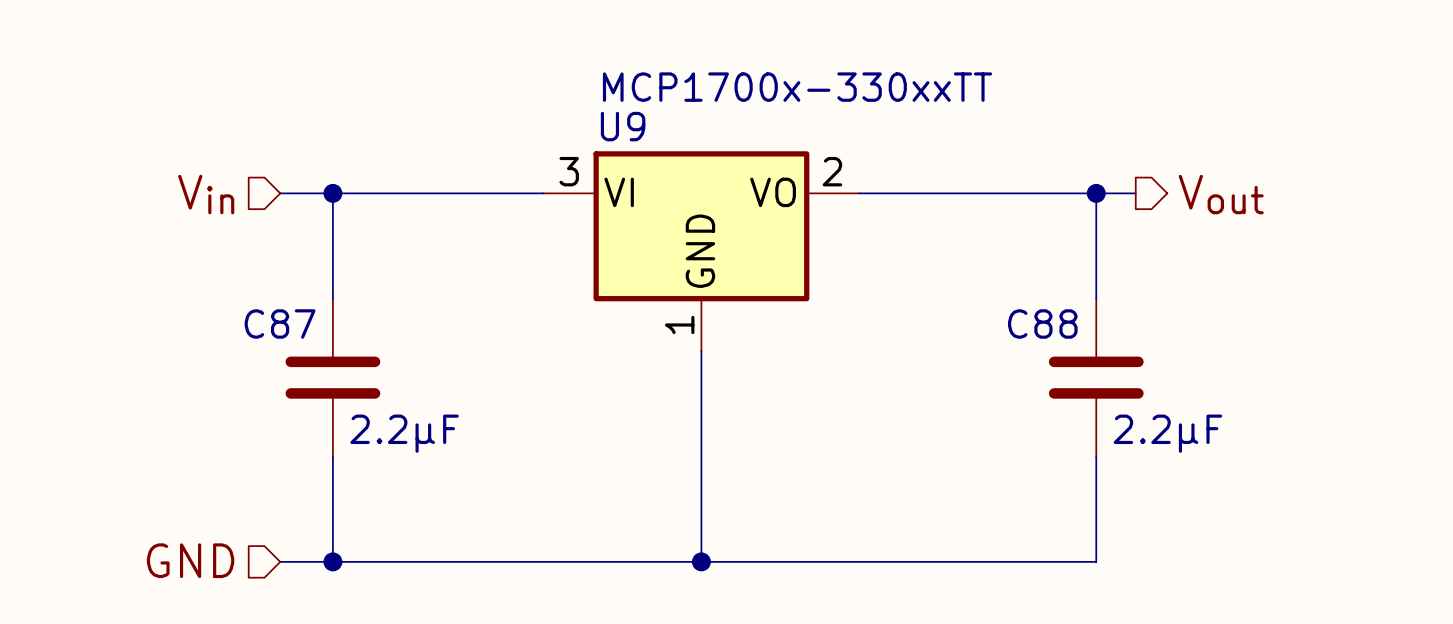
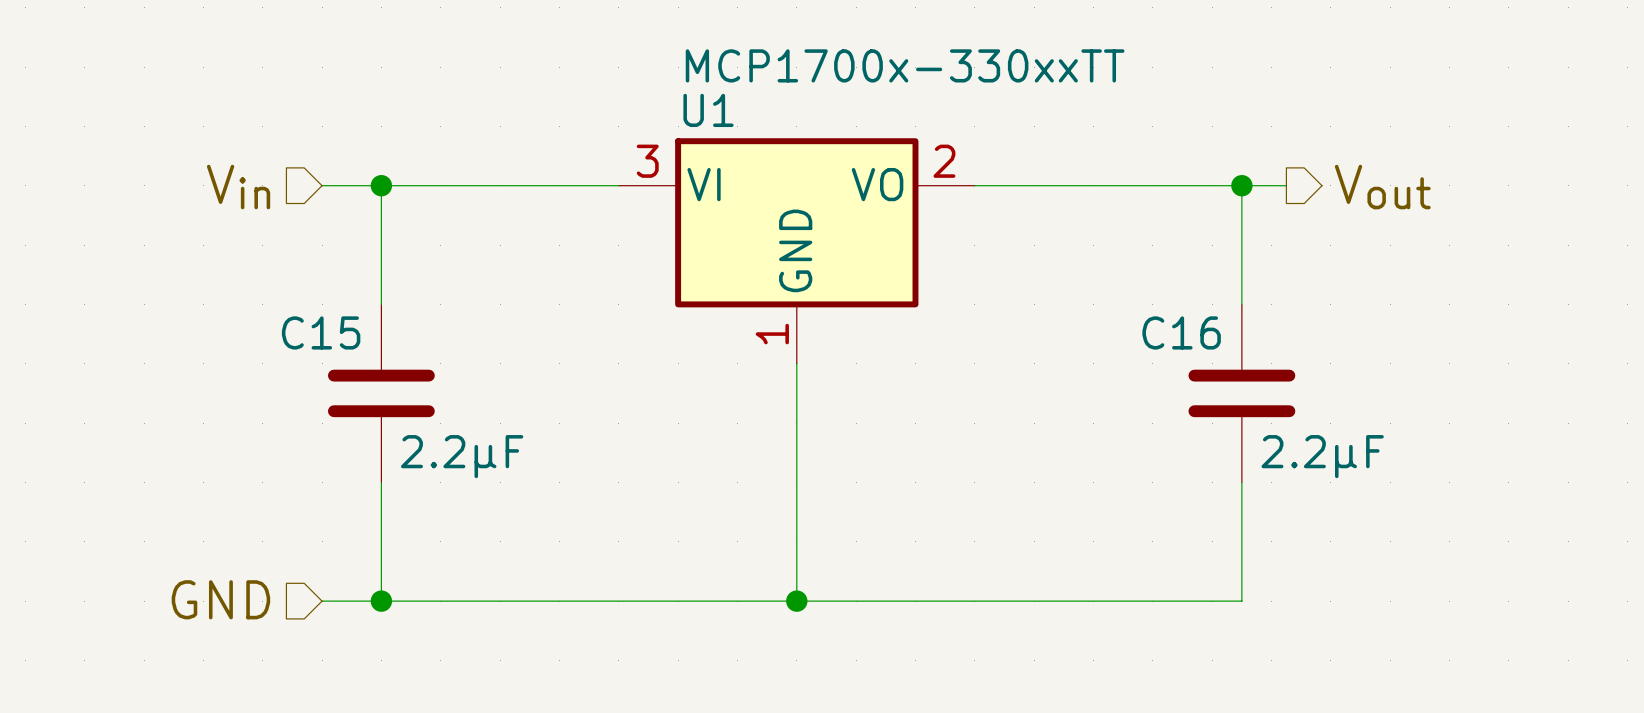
U9 name: U9 (623, 126) -> U1 (708, 110)
C87 name: C87 (280, 324) -> C15 (321, 332)
C88 name: C88 (1042, 324) -> C16 (1181, 332)

